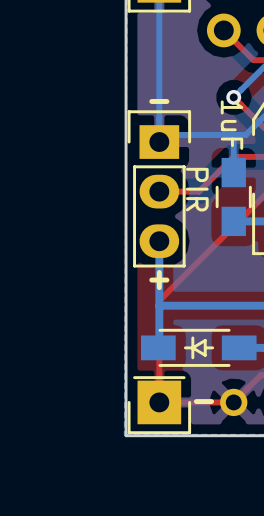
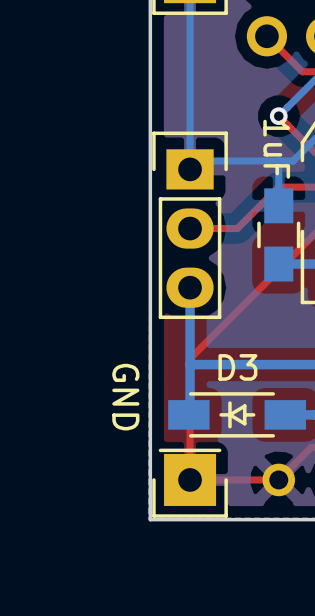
text: - (159, 101) -> none
text: PIR (197, 189) -> none
text: + (159, 280) -> none
D3 name: none -> D3 (237, 367)
text: none -> GND (125, 397)
text: - (203, 401) -> none

